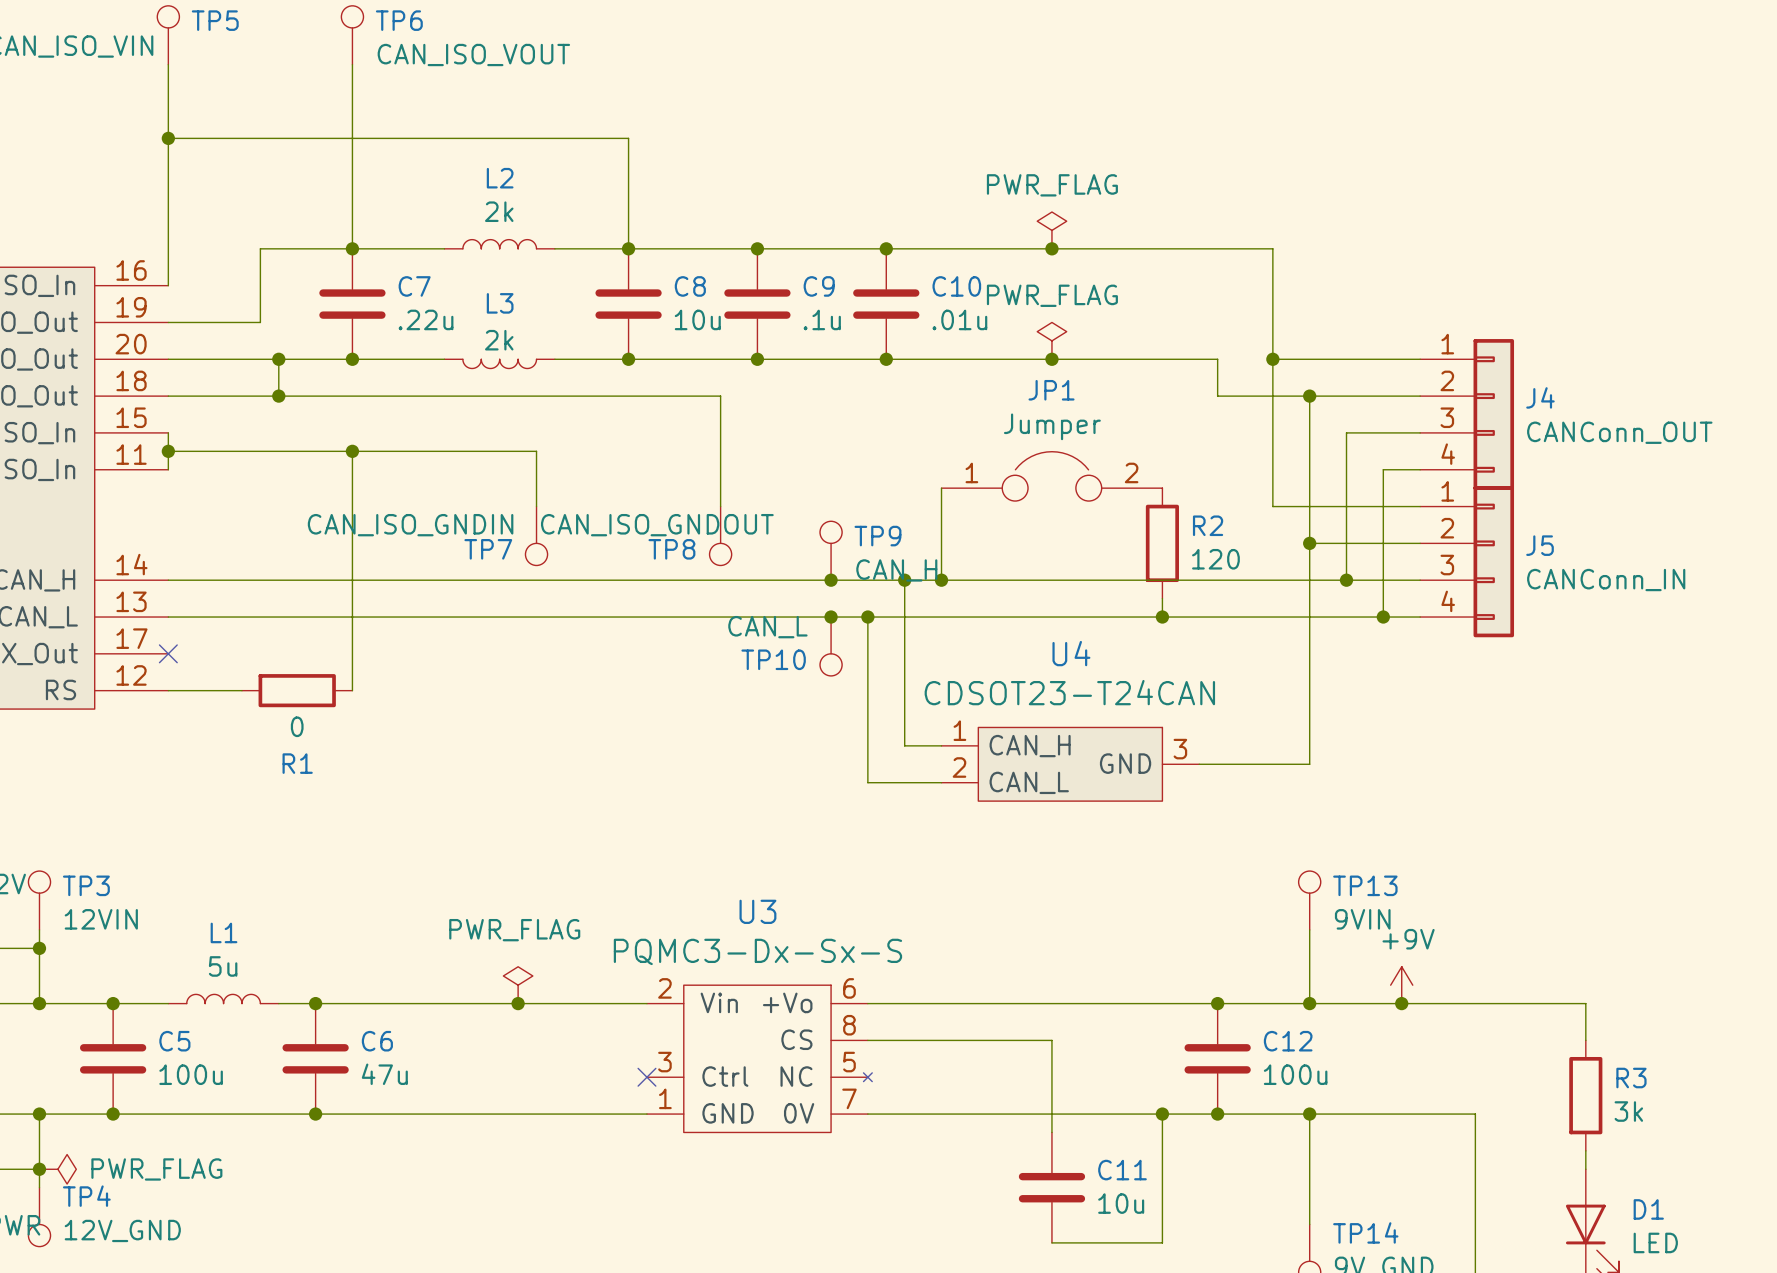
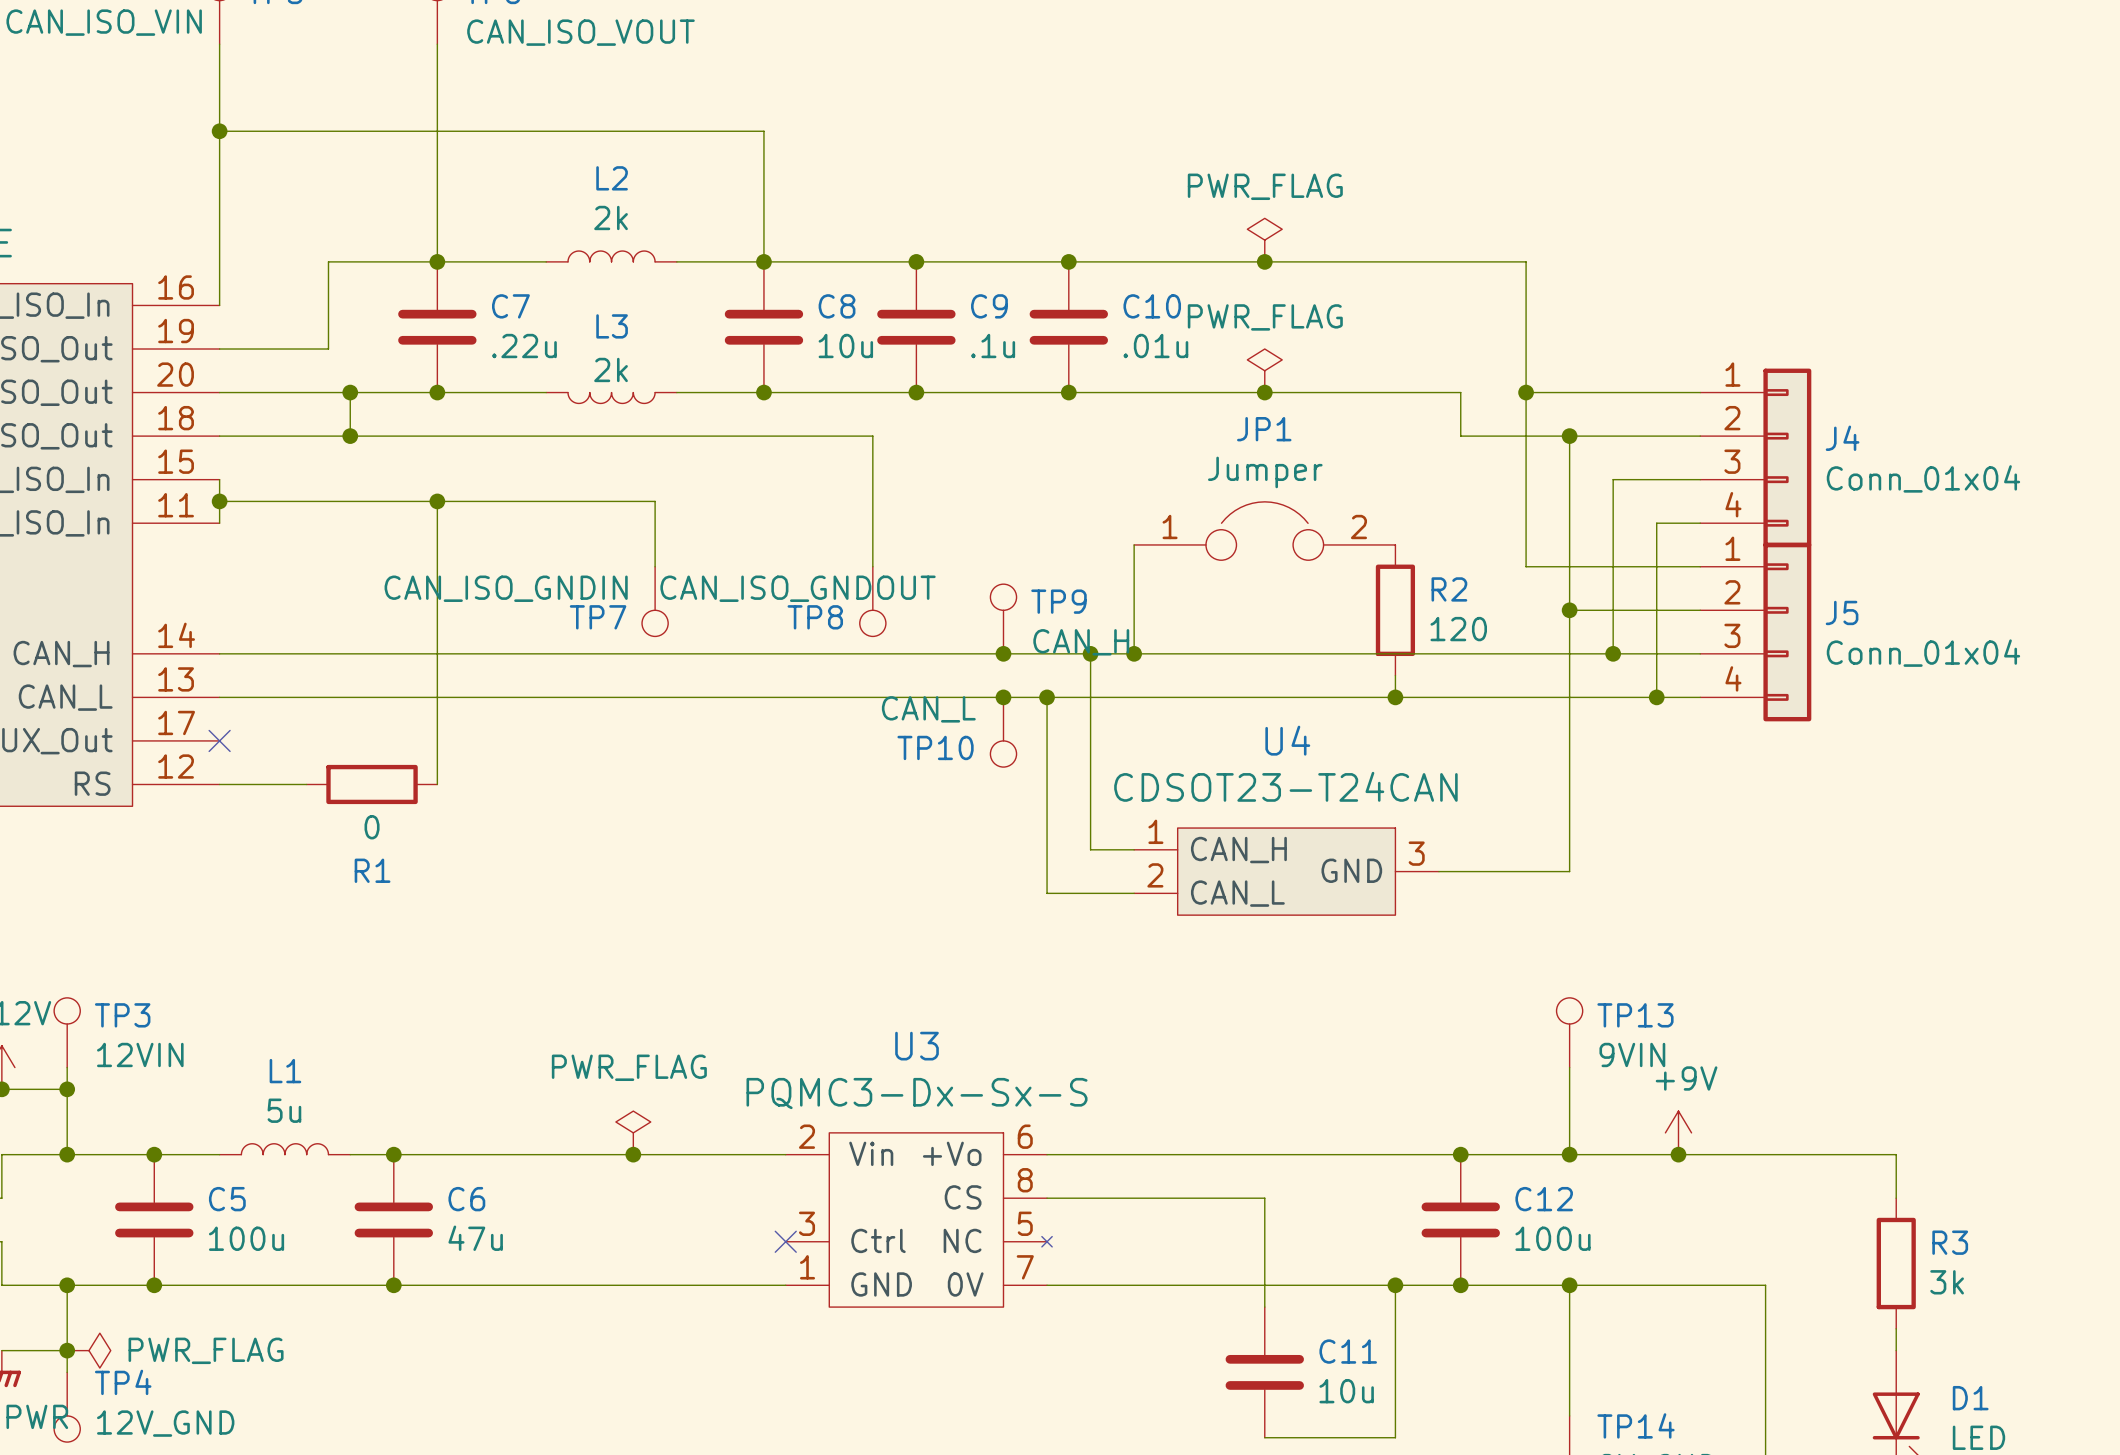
J4 value: CANConn_OUT (1619, 432) -> Conn_01x04 (1923, 478)
J5 value: CANConn_IN (1606, 580) -> Conn_01x04 (1923, 653)

